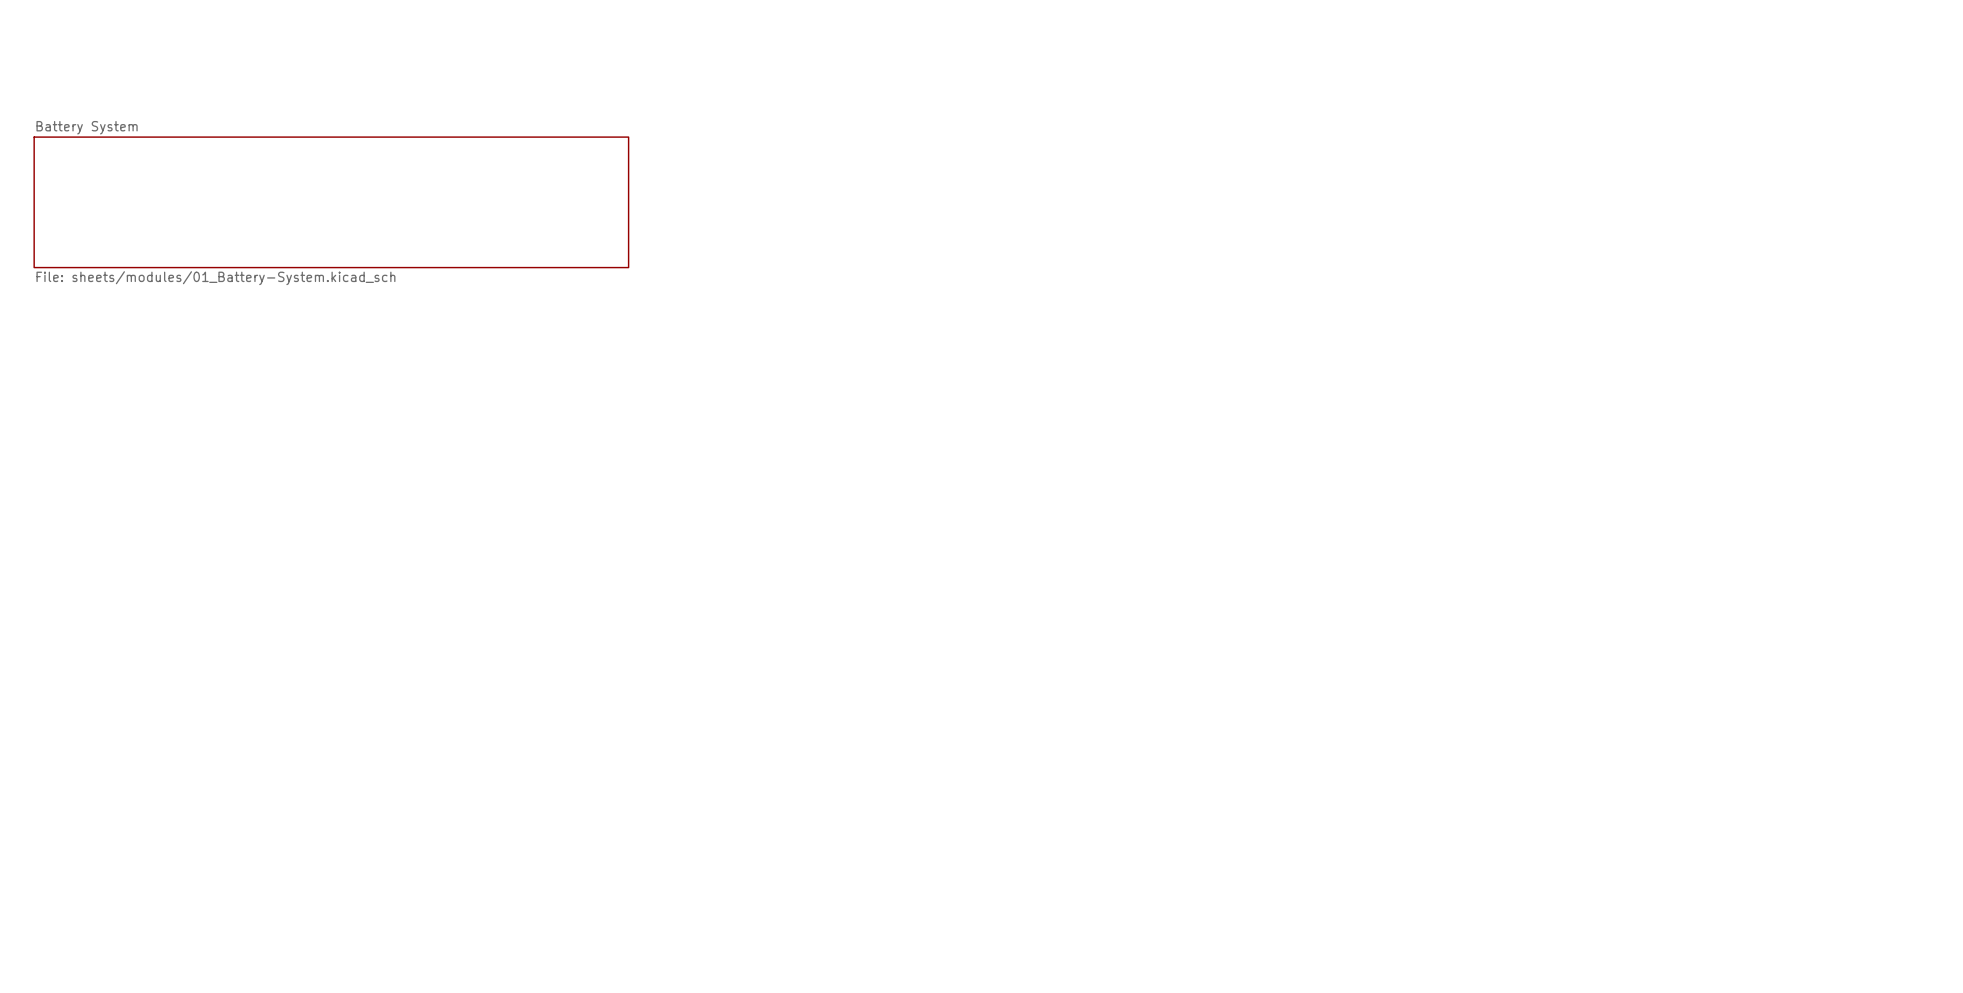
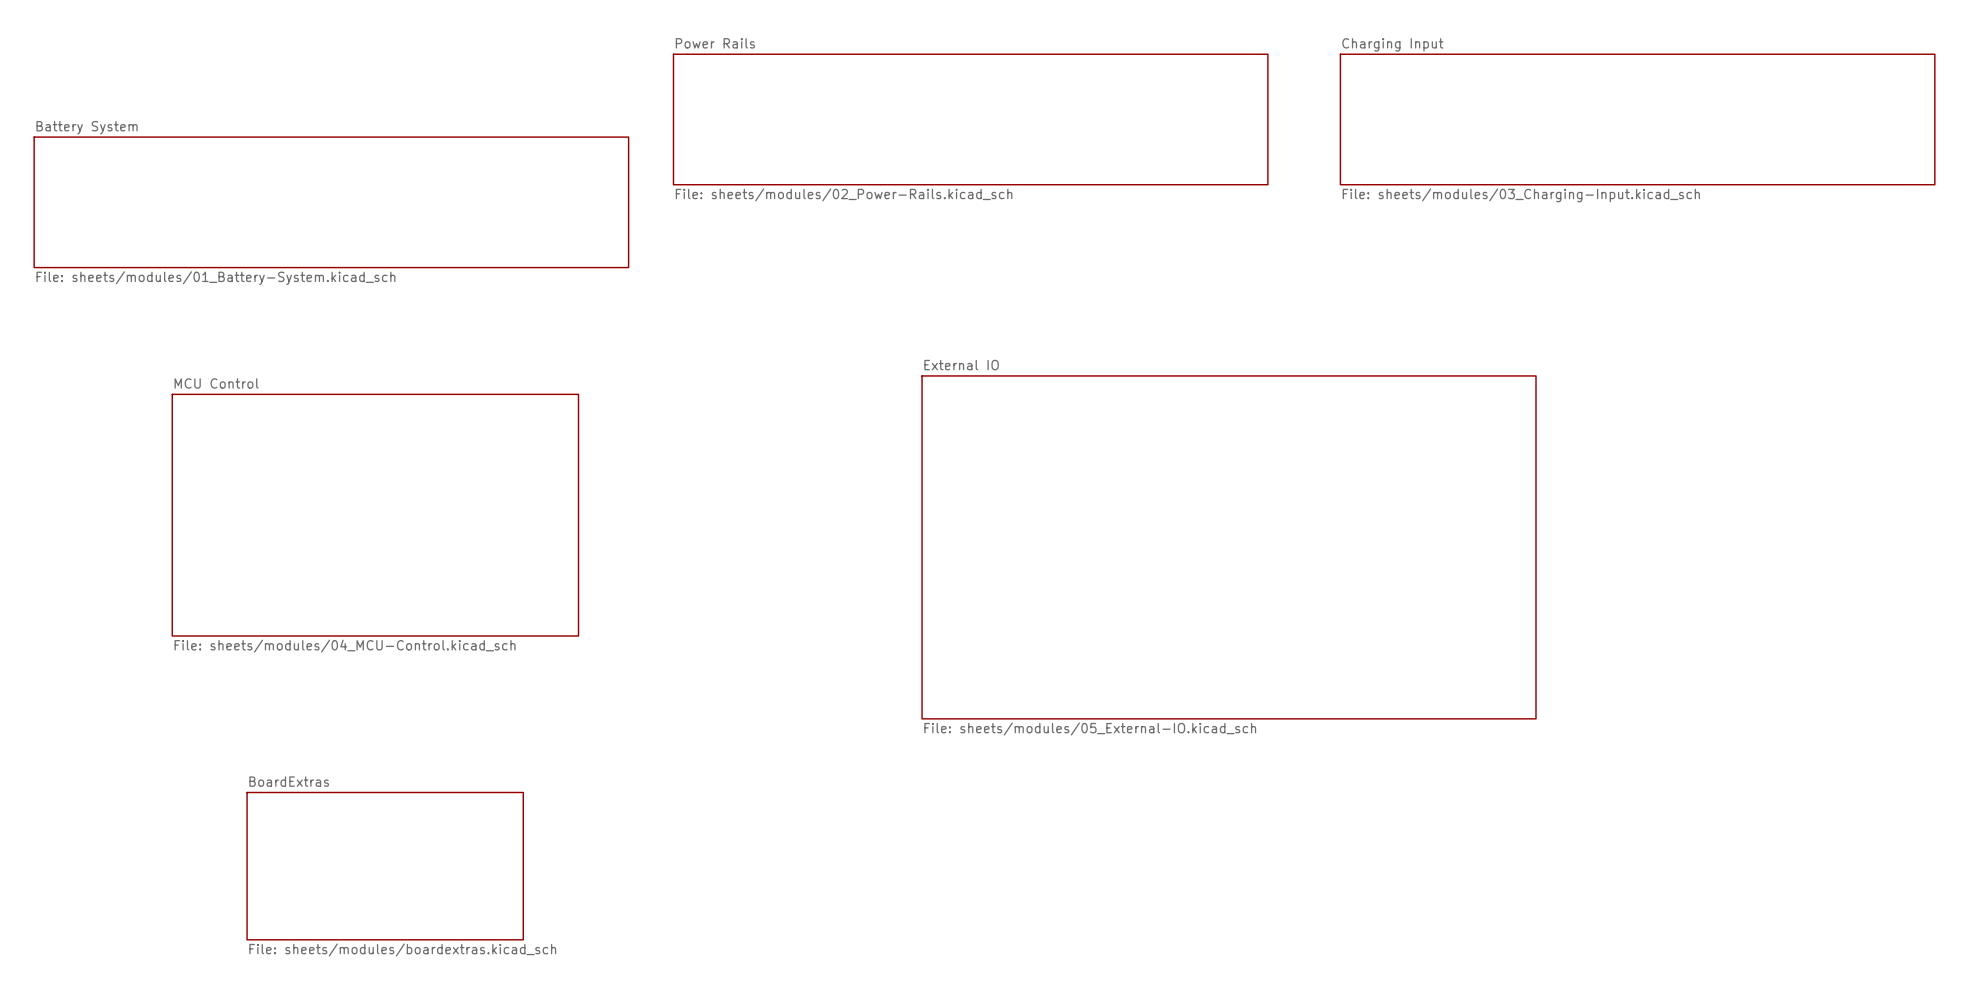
sheet Power Rails: none -> File: sheets/modules/02_Power-Rails.kicad_sch (970, 119)
sheet Charging Input: none -> File: sheets/modules/03_Charging-Input.kicad_sch (1637, 119)
sheet MCU Control: none -> File: sheets/modules/04_MCU-Control.kicad_sch (375, 515)
sheet External IO: none -> File: sheets/modules/05_External-IO.kicad_sch (1229, 547)
sheet BoardExtras: none -> File: sheets/modules/boardextras.kicad_sch (385, 866)

